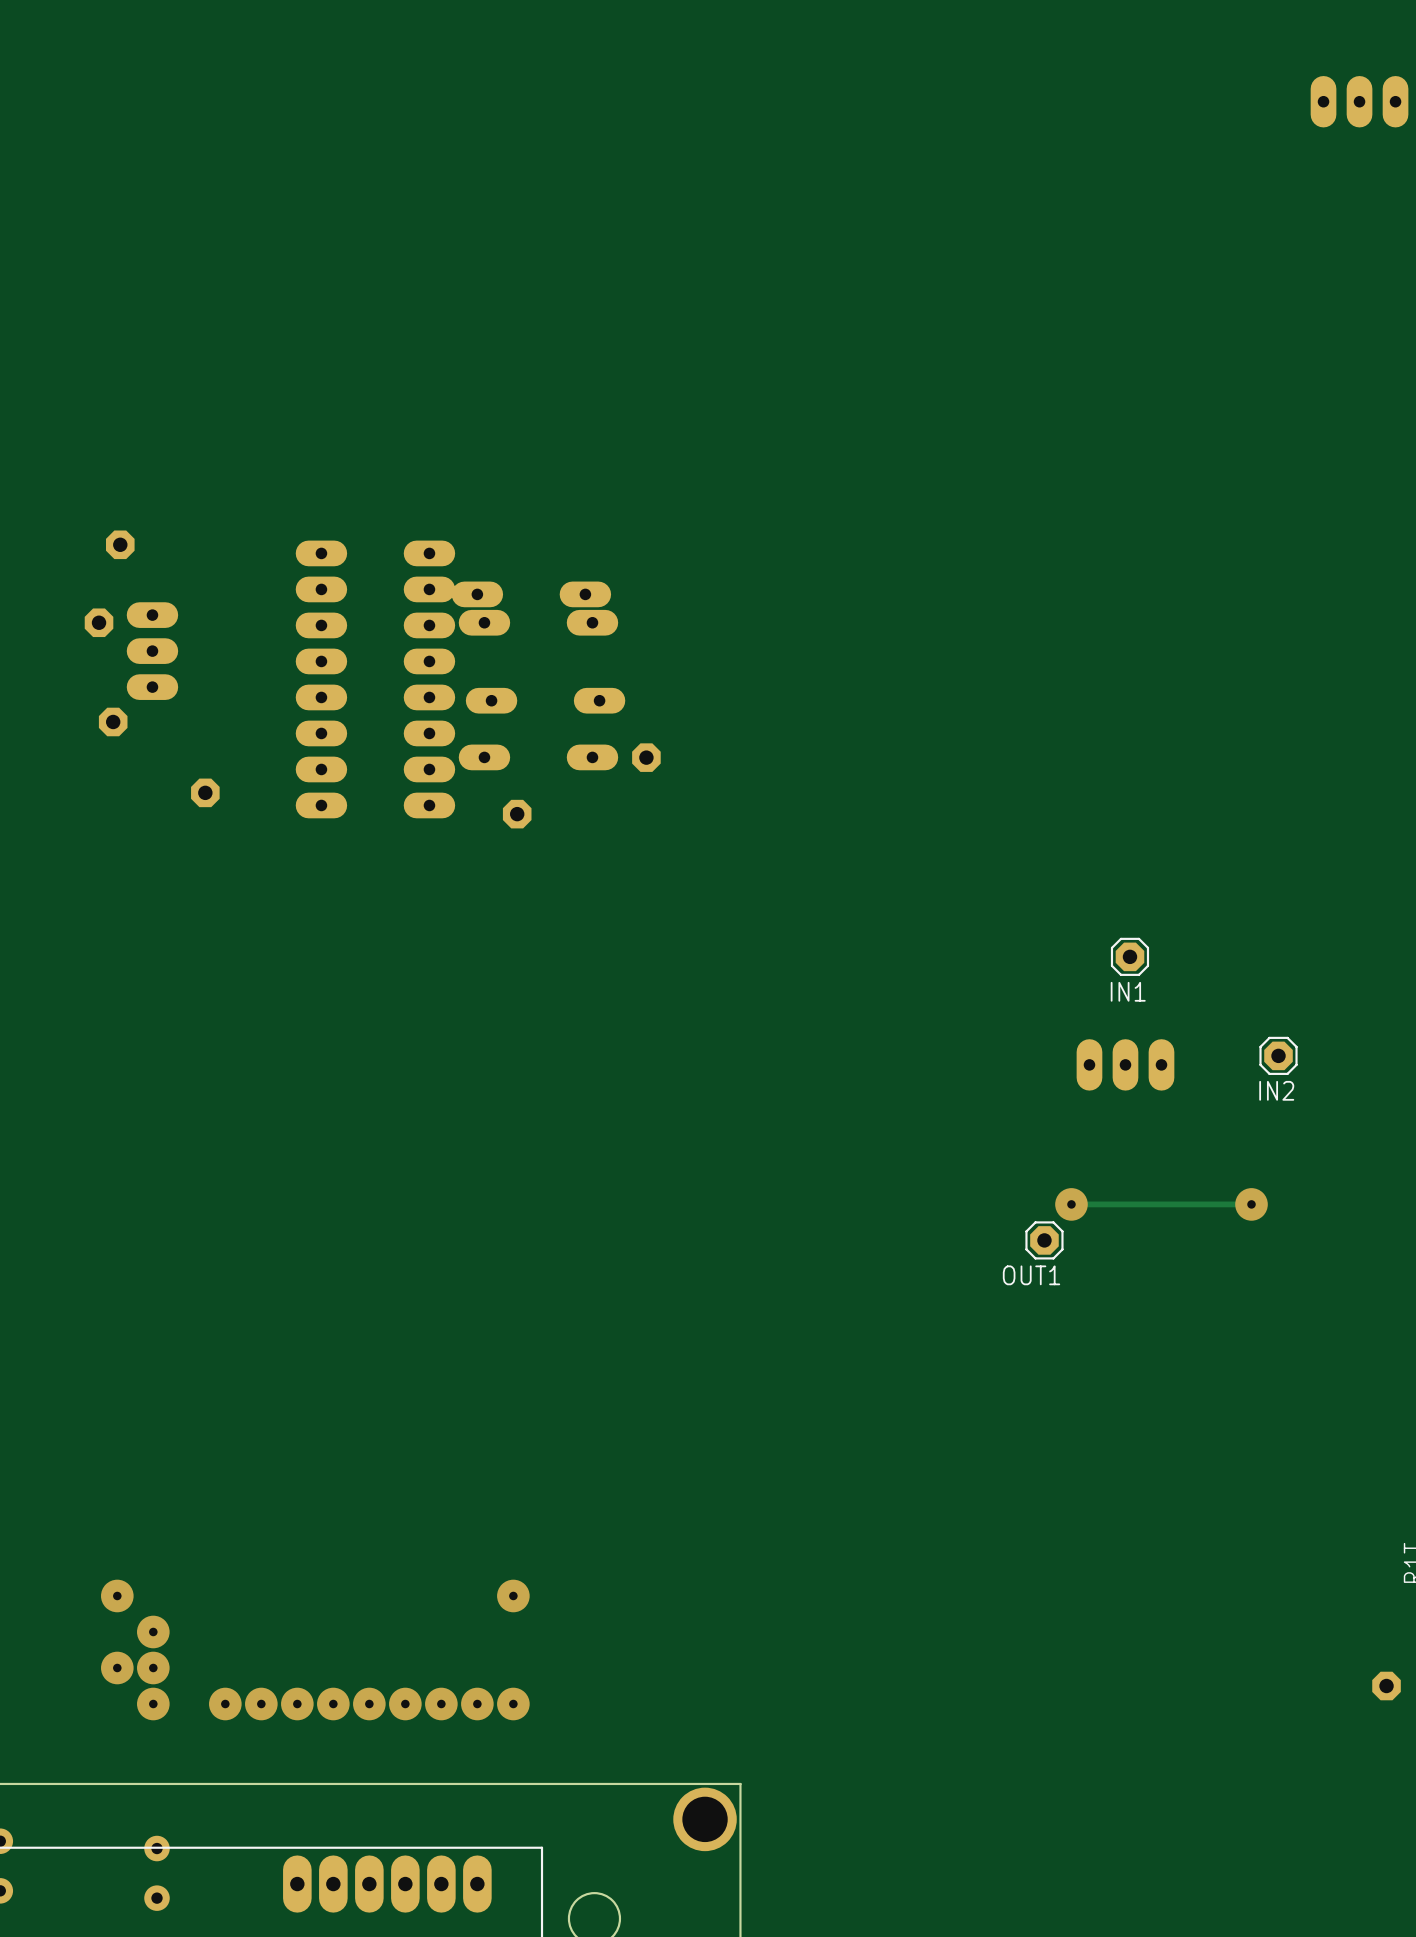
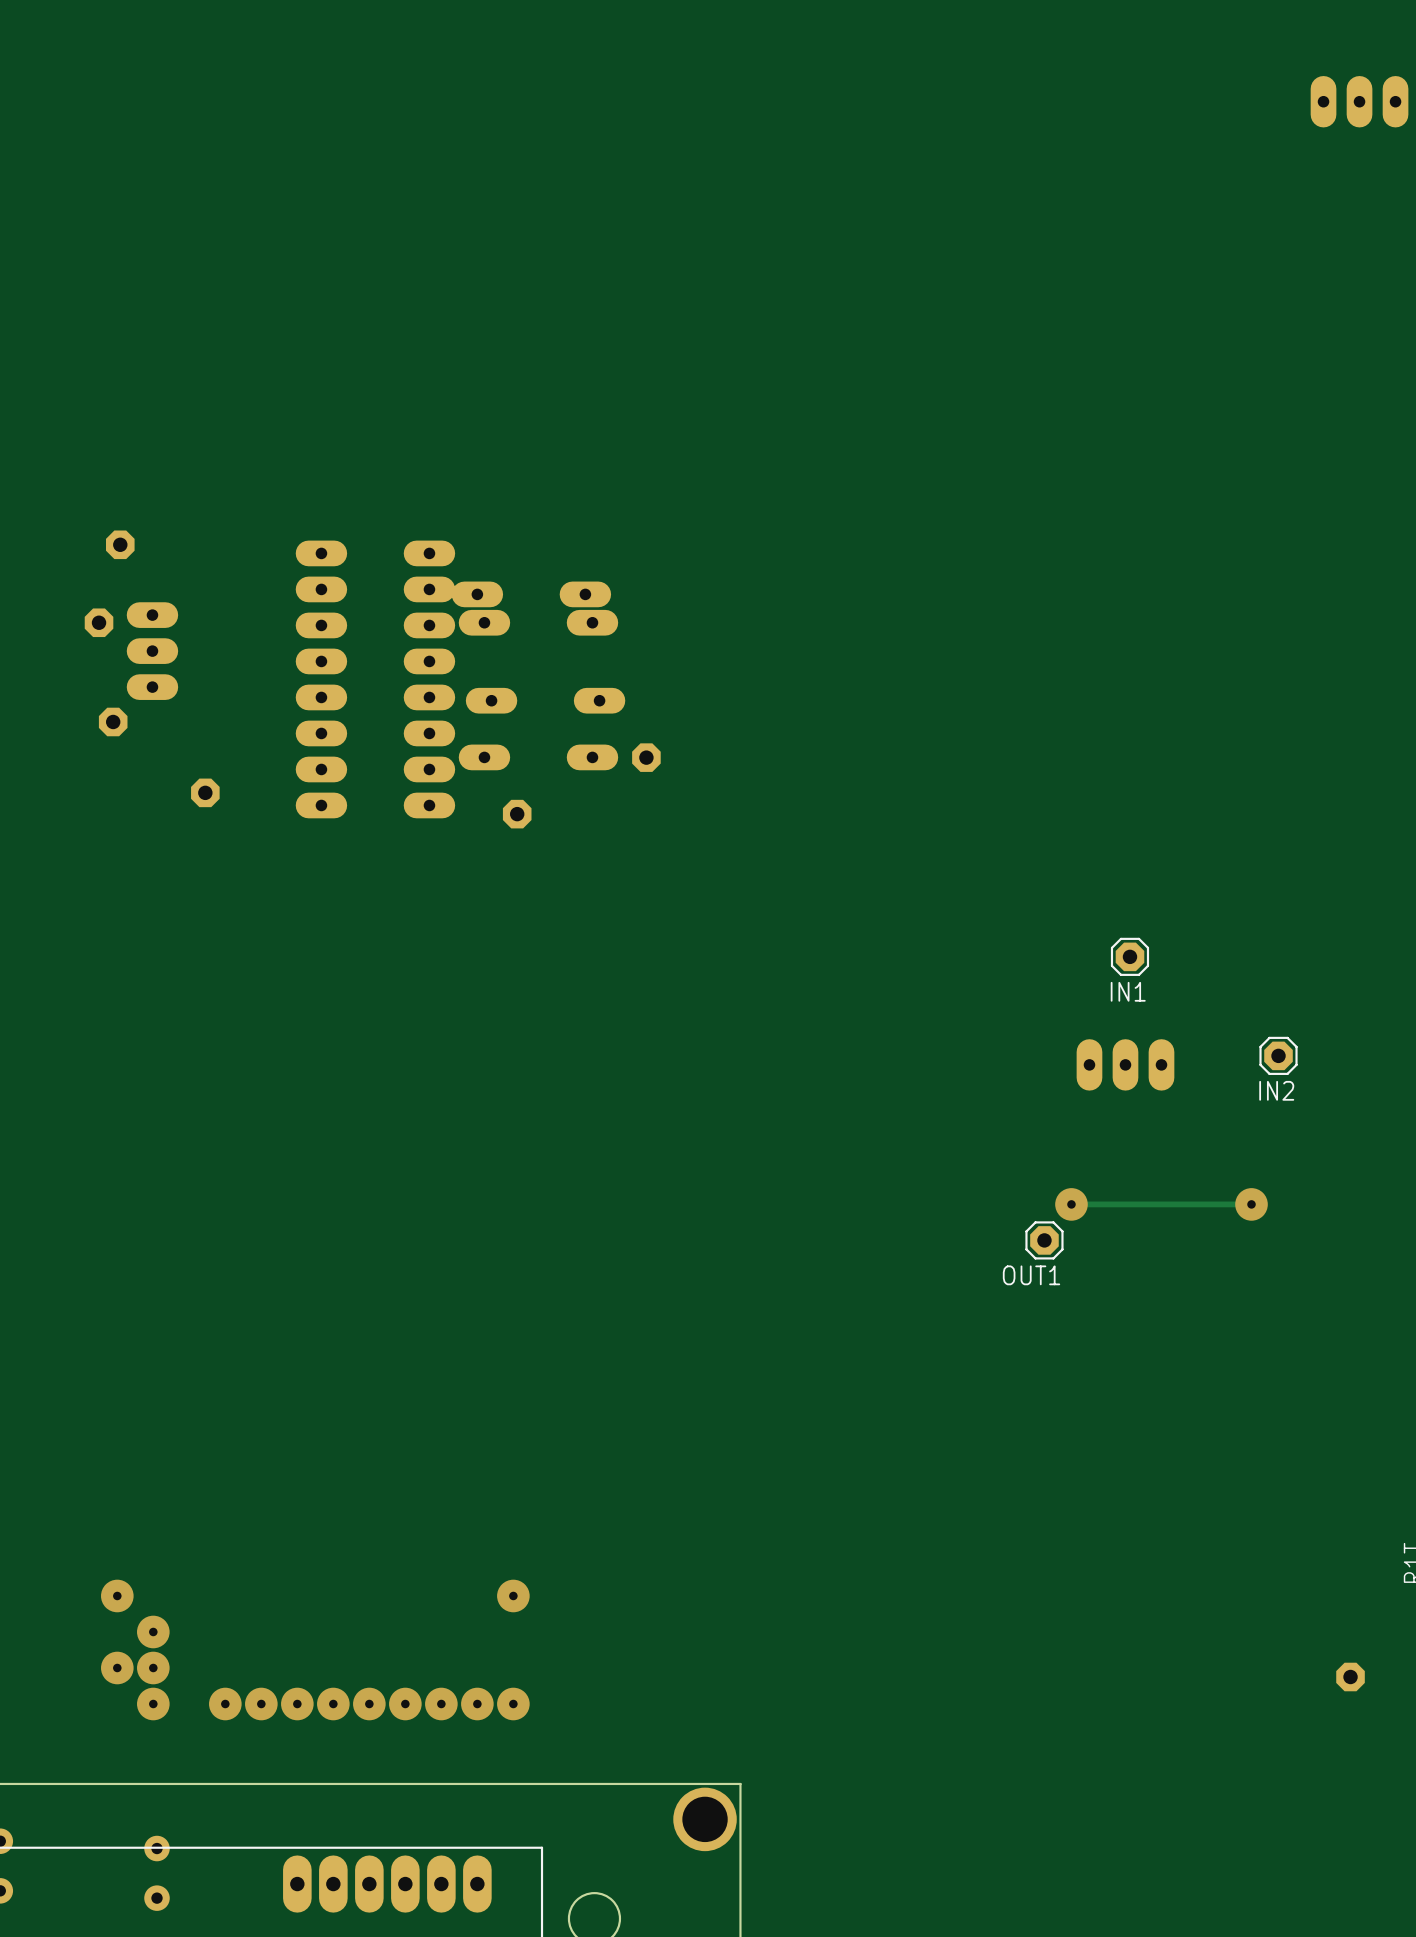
part position: (1386, 1686) -> (1350, 1677)

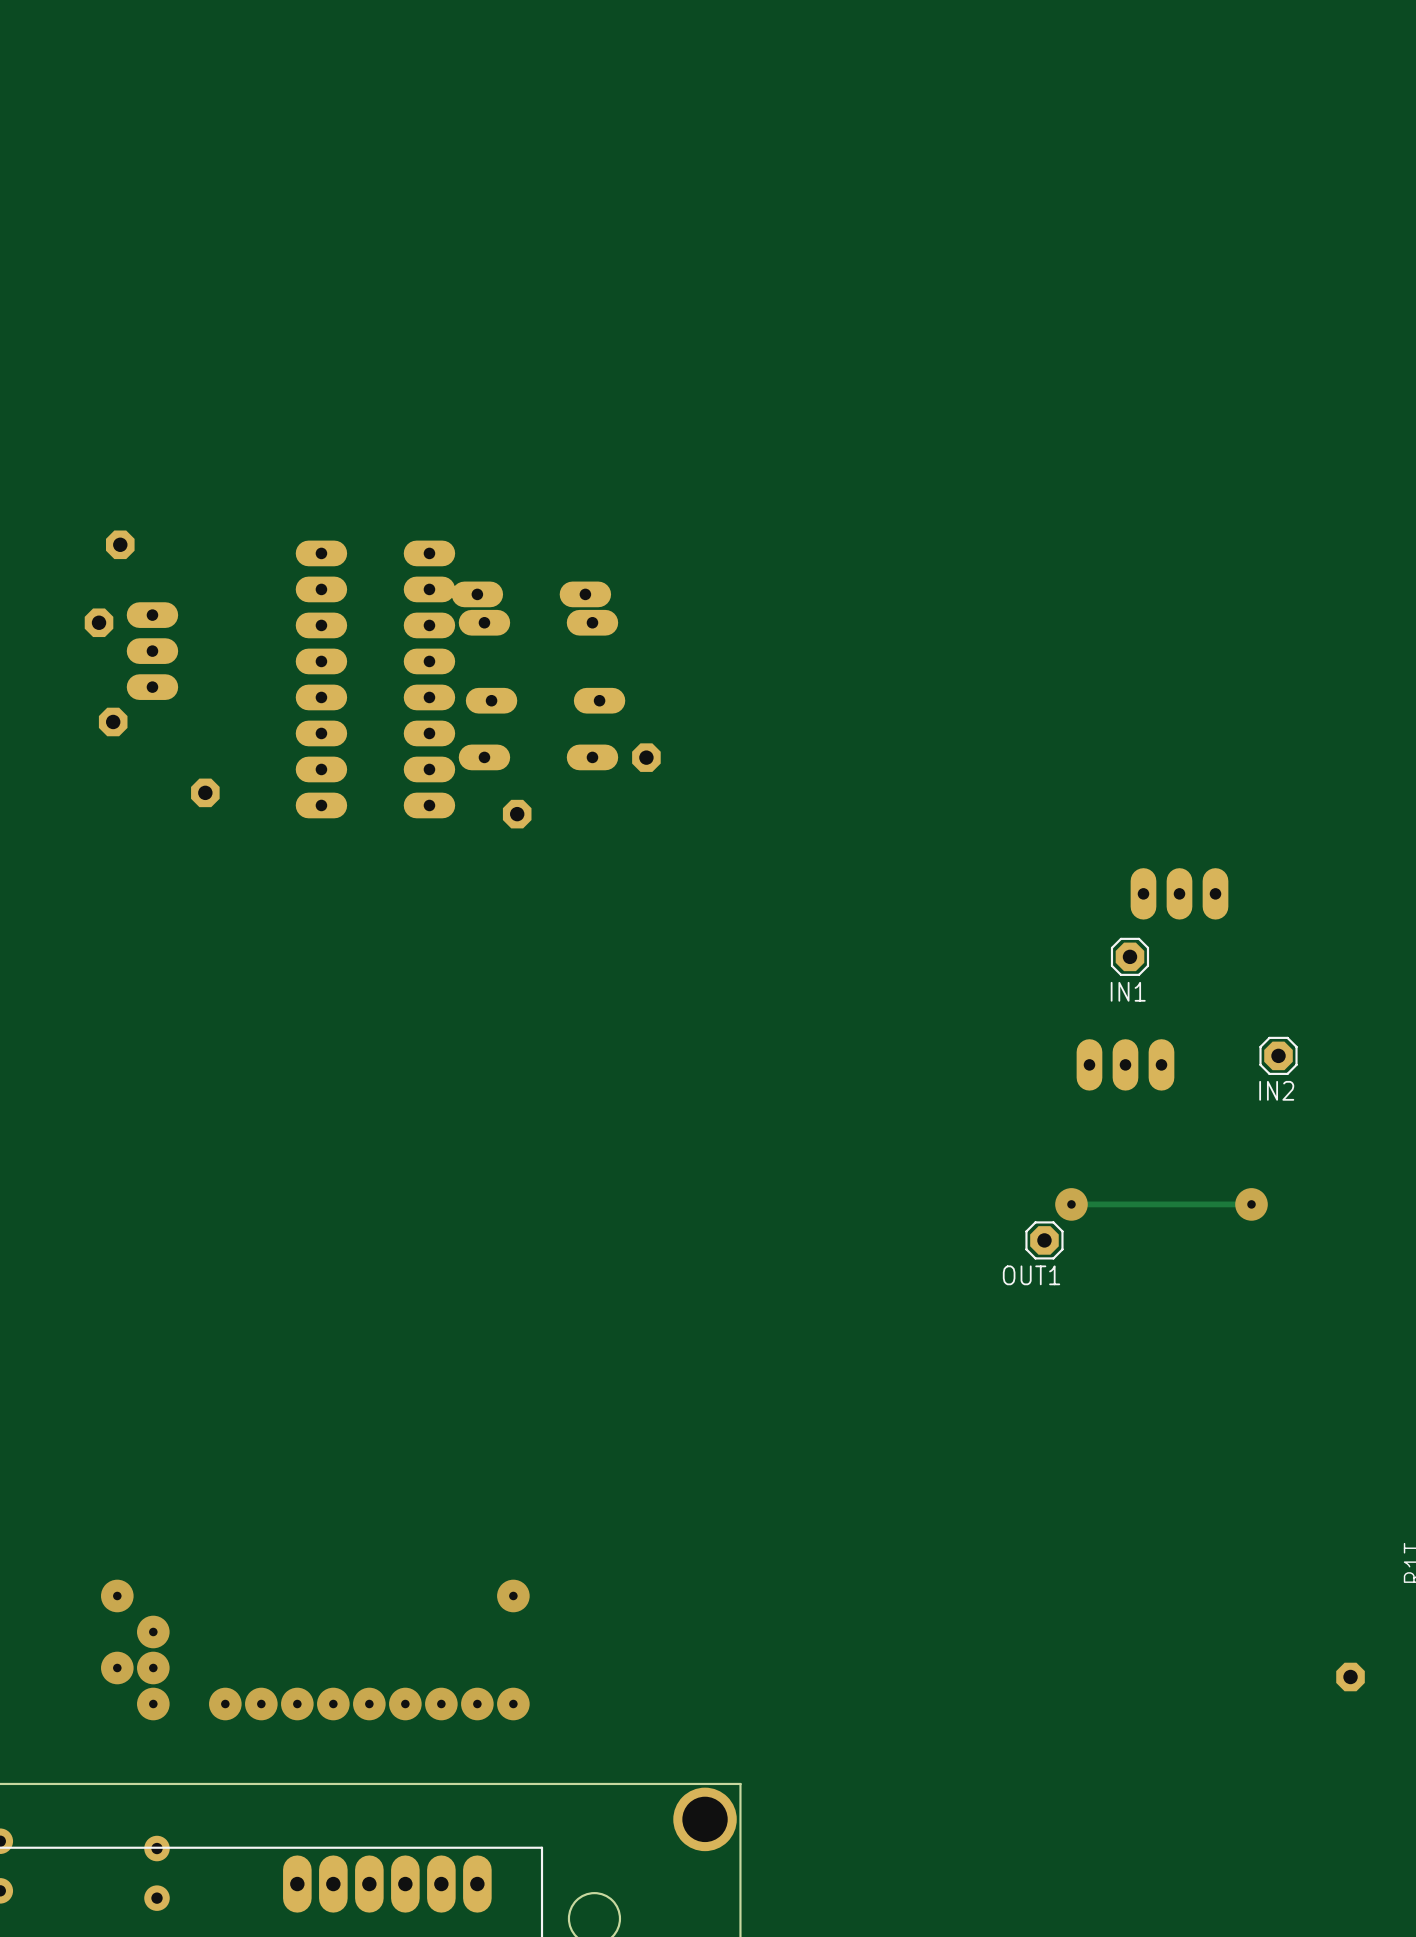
part: (1359, 101) -> none
part: none -> (1179, 893)

